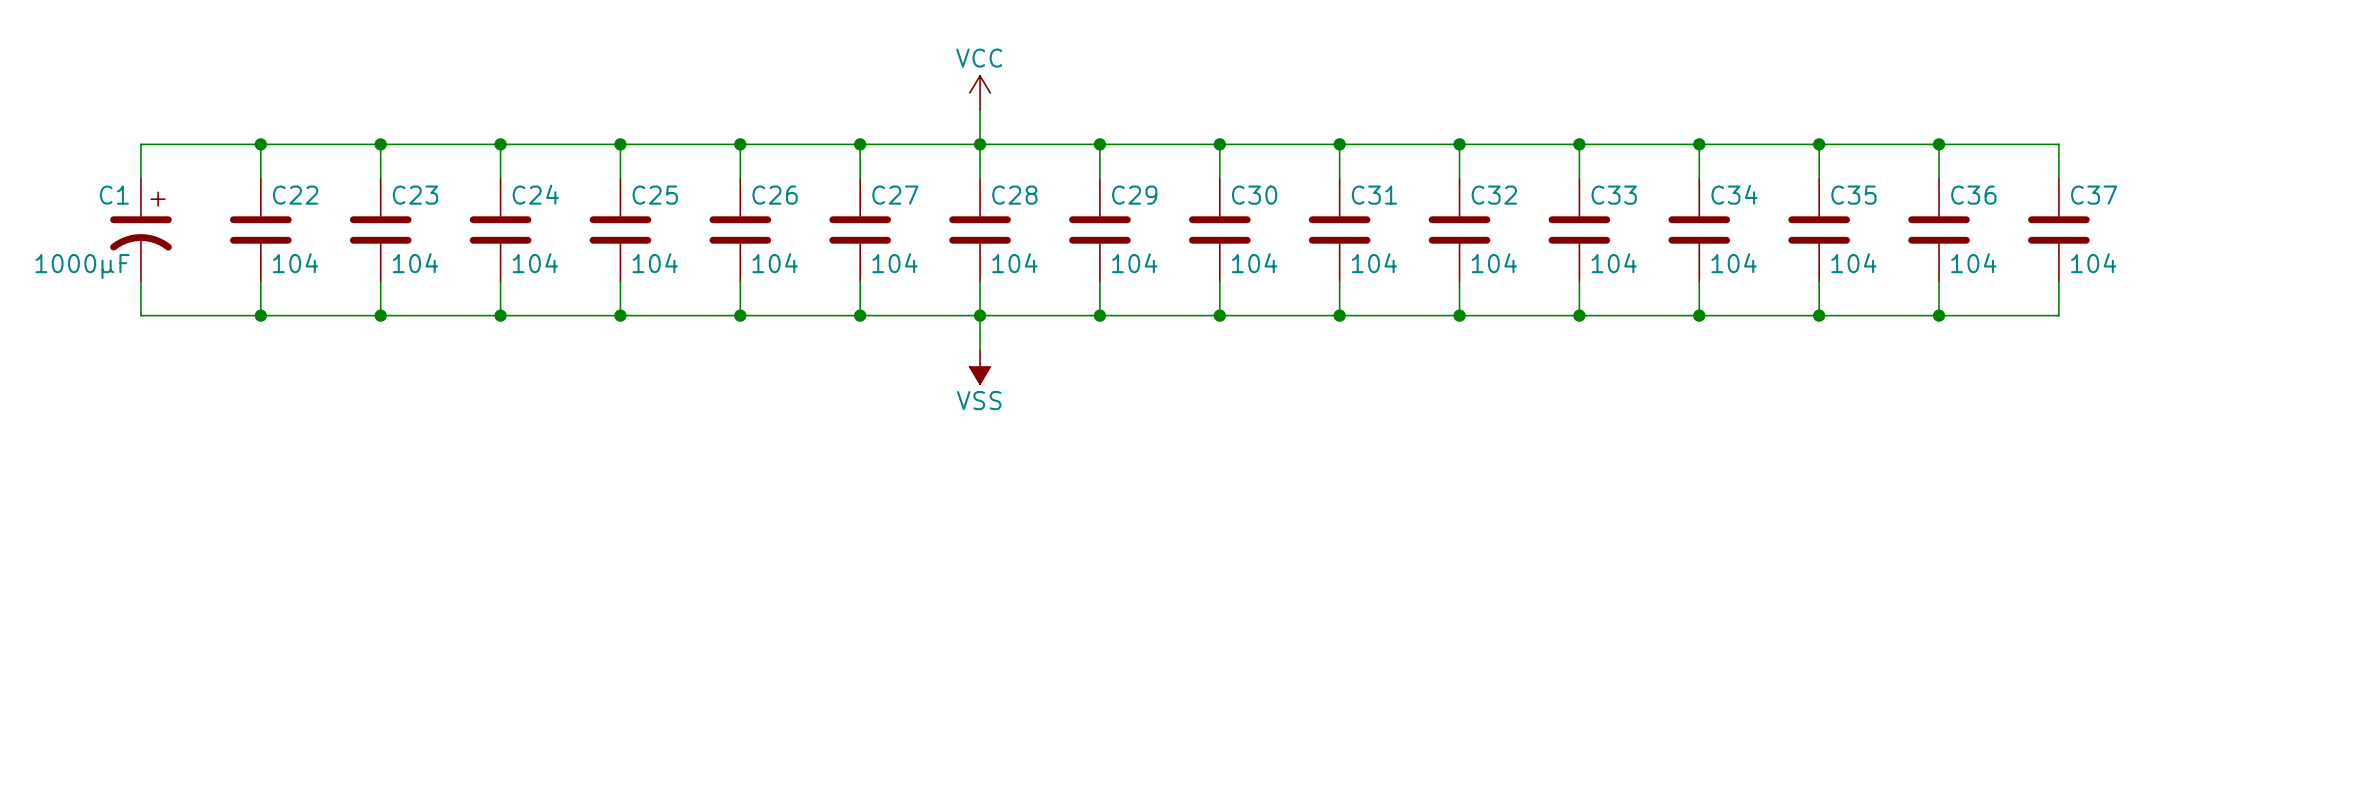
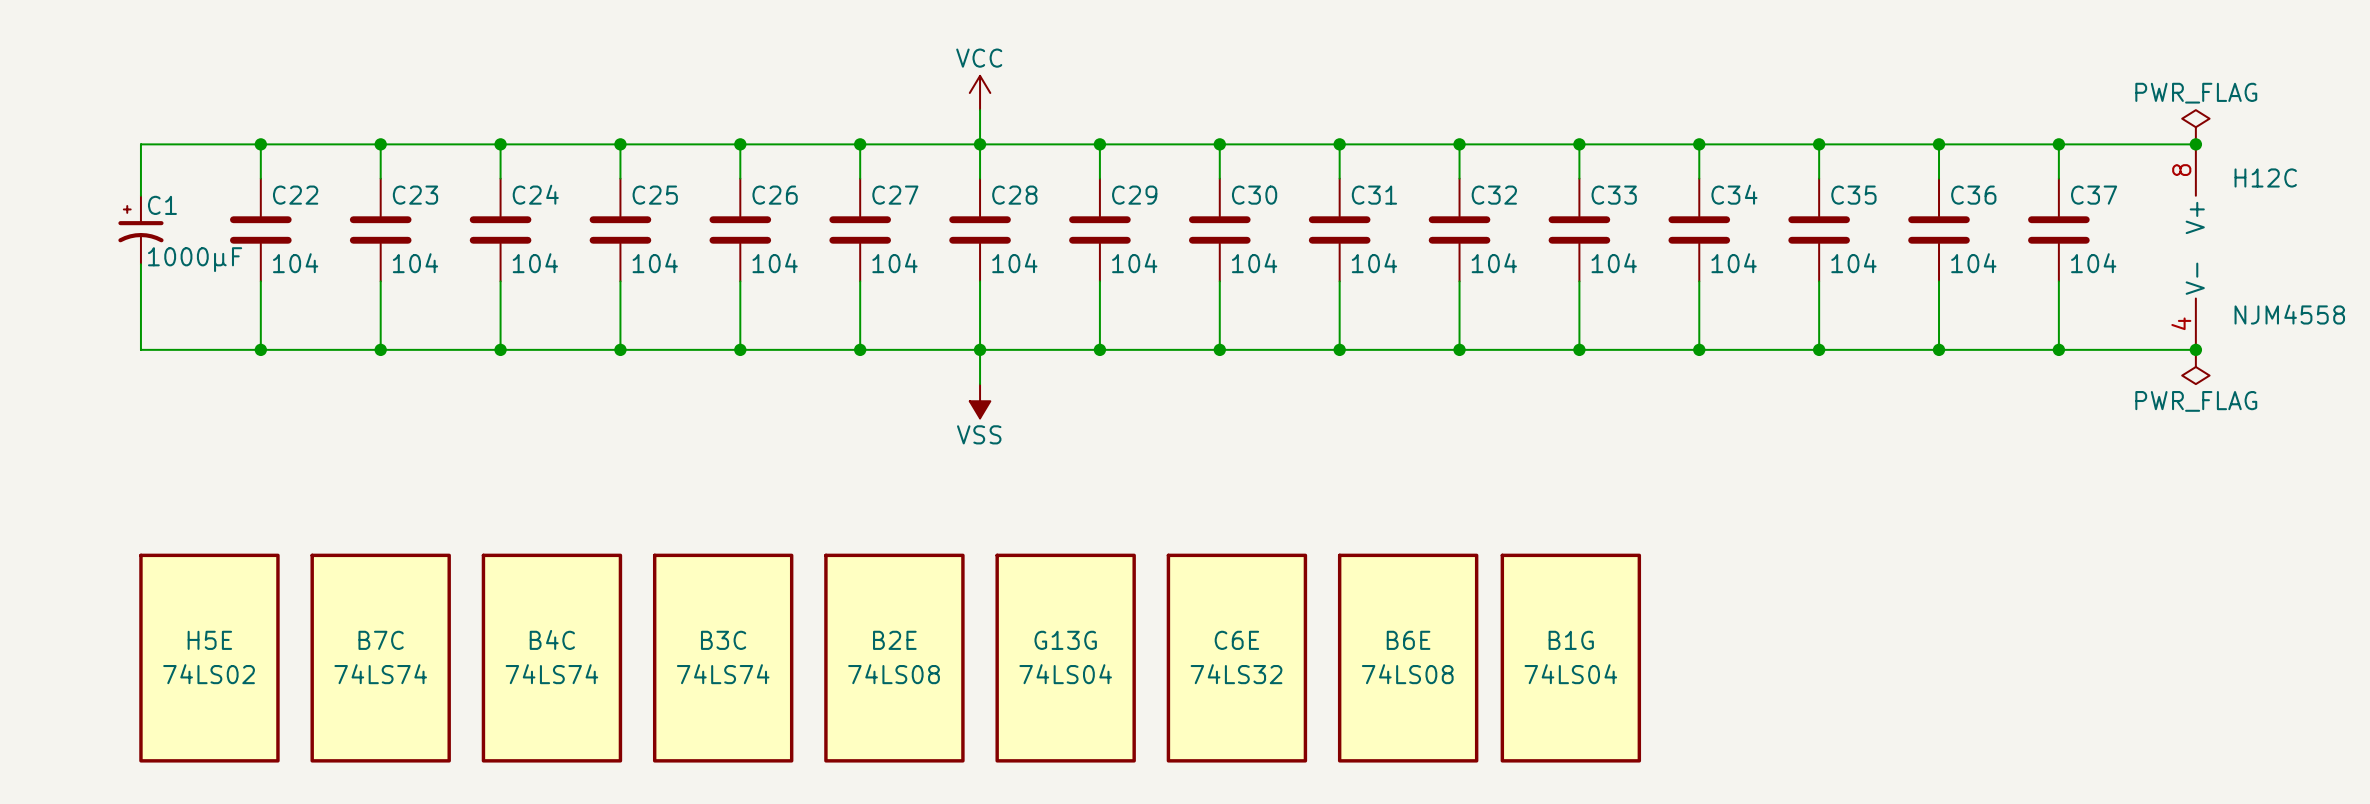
power symbol: none -> PWR_FLAG (2195, 127)
wire: none -> (2058, 144) (2195, 144)
junction: none -> (2058, 144)
junction: none -> (2195, 144)
C1 symbol: [110, 178, 172, 282] -> [118, 195, 164, 265]
C1 name position: C1 (114, 195) -> C1 (162, 205)
H12C: none -> NJM4558 (2195, 247)
C1 value position: 1000μF (82, 266) -> 1000μF (195, 259)
wire: (140, 315) (2058, 315) -> (140, 315) (140, 349) (2195, 349)
wire: none -> (260, 315) (260, 349)
junction position: (260, 315) -> (260, 349)
wire: none -> (380, 315) (380, 349)
junction position: (380, 315) -> (380, 349)
wire: none -> (500, 315) (500, 349)
junction position: (500, 315) -> (500, 349)
wire: none -> (620, 315) (620, 349)
junction position: (620, 315) -> (620, 349)
wire: none -> (740, 315) (740, 349)
junction position: (740, 315) -> (740, 349)
wire: none -> (860, 315) (860, 349)
junction position: (860, 315) -> (860, 349)
junction position: (980, 315) -> (980, 349)
wire: none -> (1099, 315) (1099, 349)
junction position: (1099, 315) -> (1099, 349)
wire: none -> (1219, 315) (1219, 349)
junction position: (1219, 315) -> (1219, 349)
wire: none -> (1339, 315) (1339, 349)
junction position: (1339, 315) -> (1339, 349)
wire: none -> (1459, 315) (1459, 349)
junction position: (1459, 315) -> (1459, 349)
wire: none -> (1579, 315) (1579, 349)
junction position: (1579, 315) -> (1579, 349)
wire: none -> (1699, 315) (1699, 349)
junction position: (1699, 315) -> (1699, 349)
wire: none -> (1819, 315) (1819, 349)
junction position: (1819, 315) -> (1819, 349)
wire: none -> (1939, 315) (1939, 349)
junction position: (1939, 315) -> (1939, 349)
wire: none -> (2058, 315) (2058, 349)
junction: none -> (2058, 349)
junction: none -> (2195, 349)
power symbol position: VSS (980, 366) -> VSS (980, 401)
power symbol: none -> PWR_FLAG (2195, 366)
H5E: none -> 74LS02 (209, 658)
B7C: none -> 74LS74 (380, 658)
B4C: none -> 74LS74 (551, 658)
B3C: none -> 74LS74 (723, 658)
B2E: none -> 74LS08 (894, 658)
G13G: none -> 74LS04 (1065, 658)
C6E: none -> 74LS32 (1236, 658)
B6E: none -> 74LS08 (1408, 658)
B1G: none -> 74LS04 (1570, 658)

